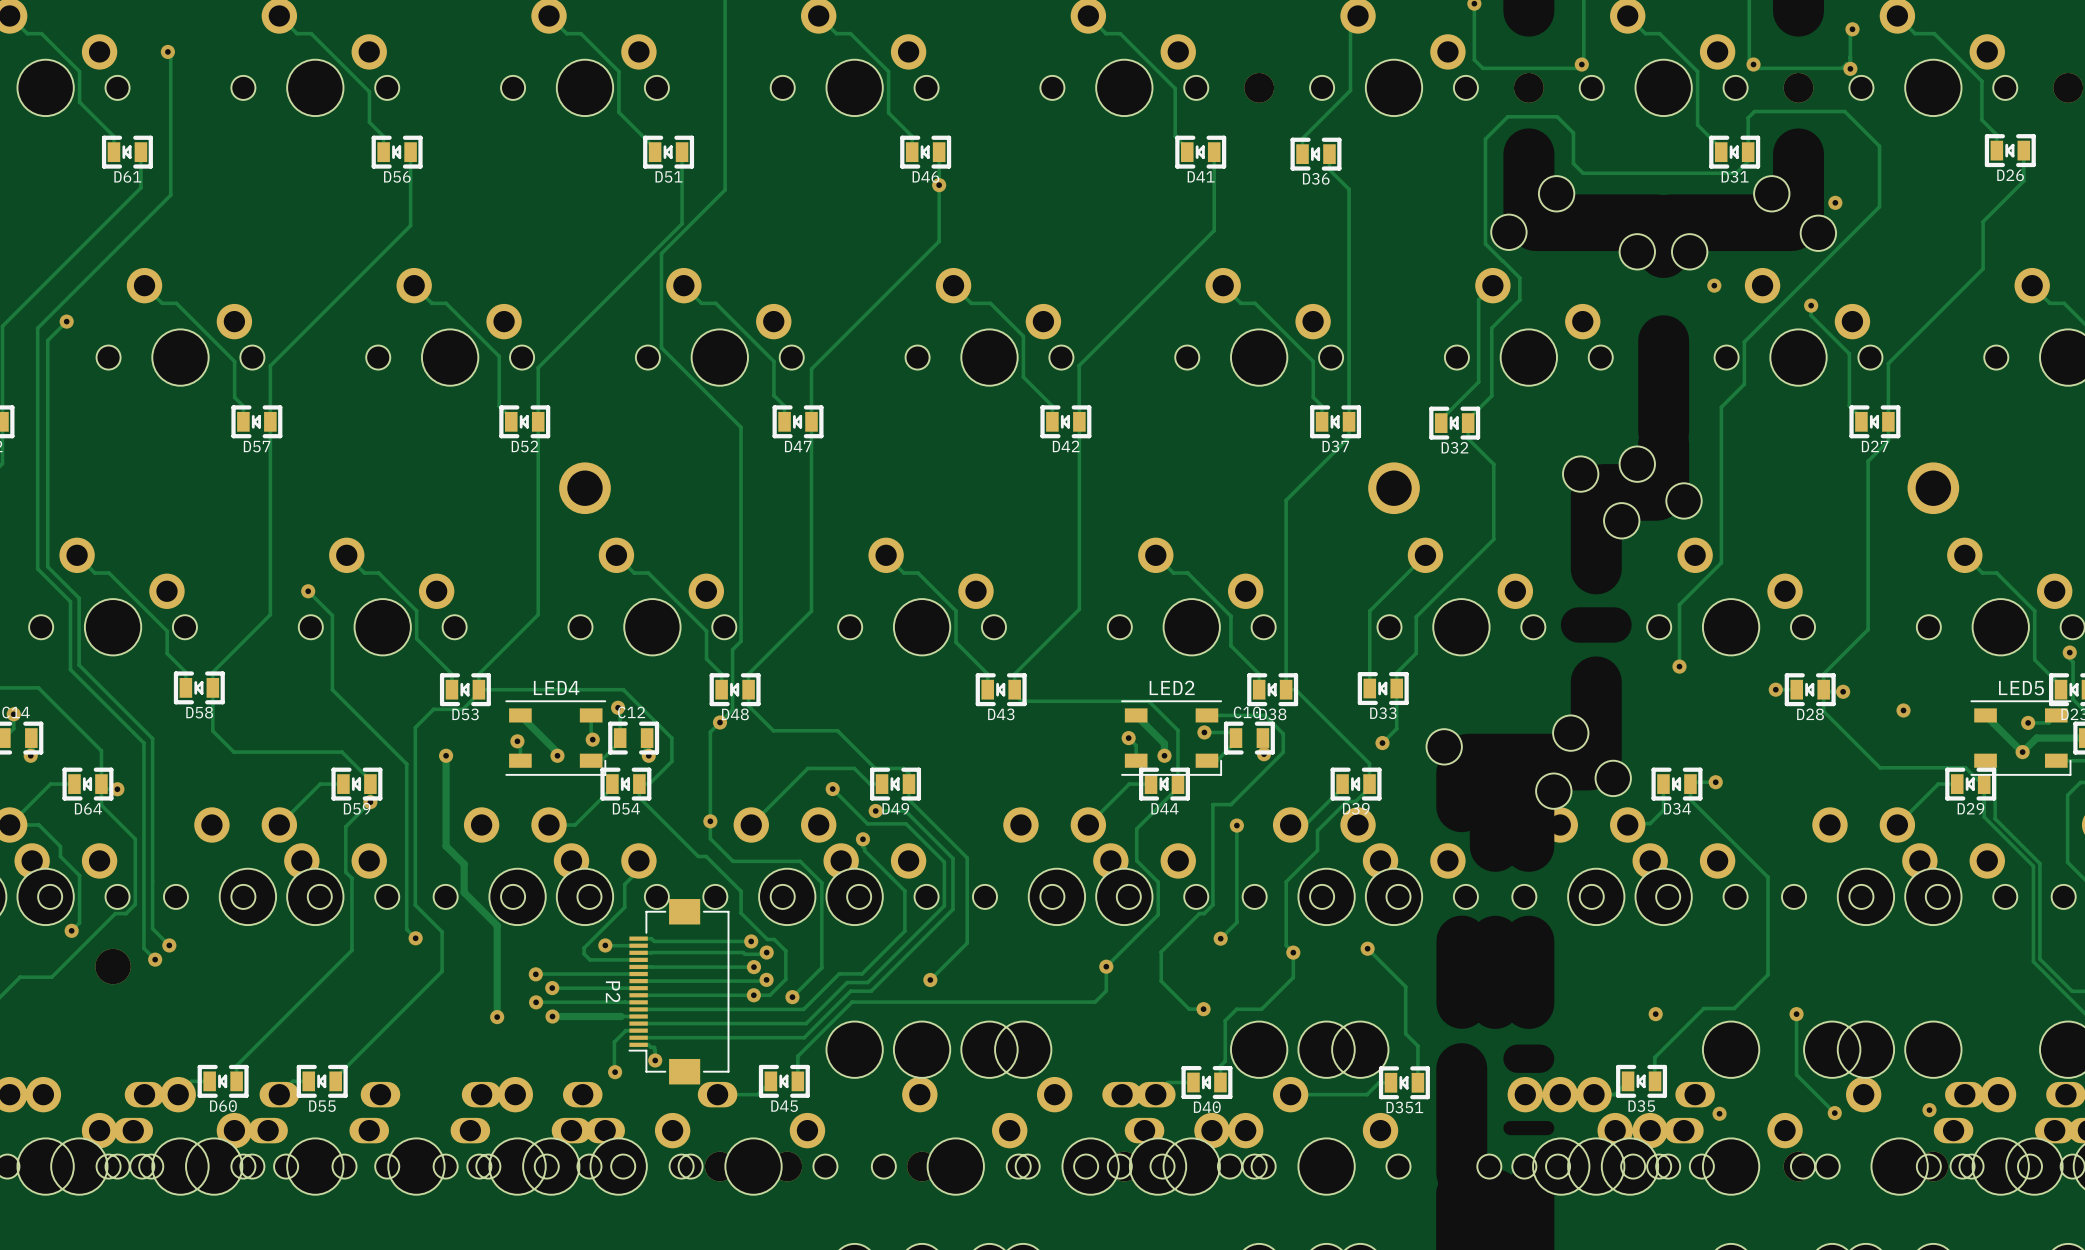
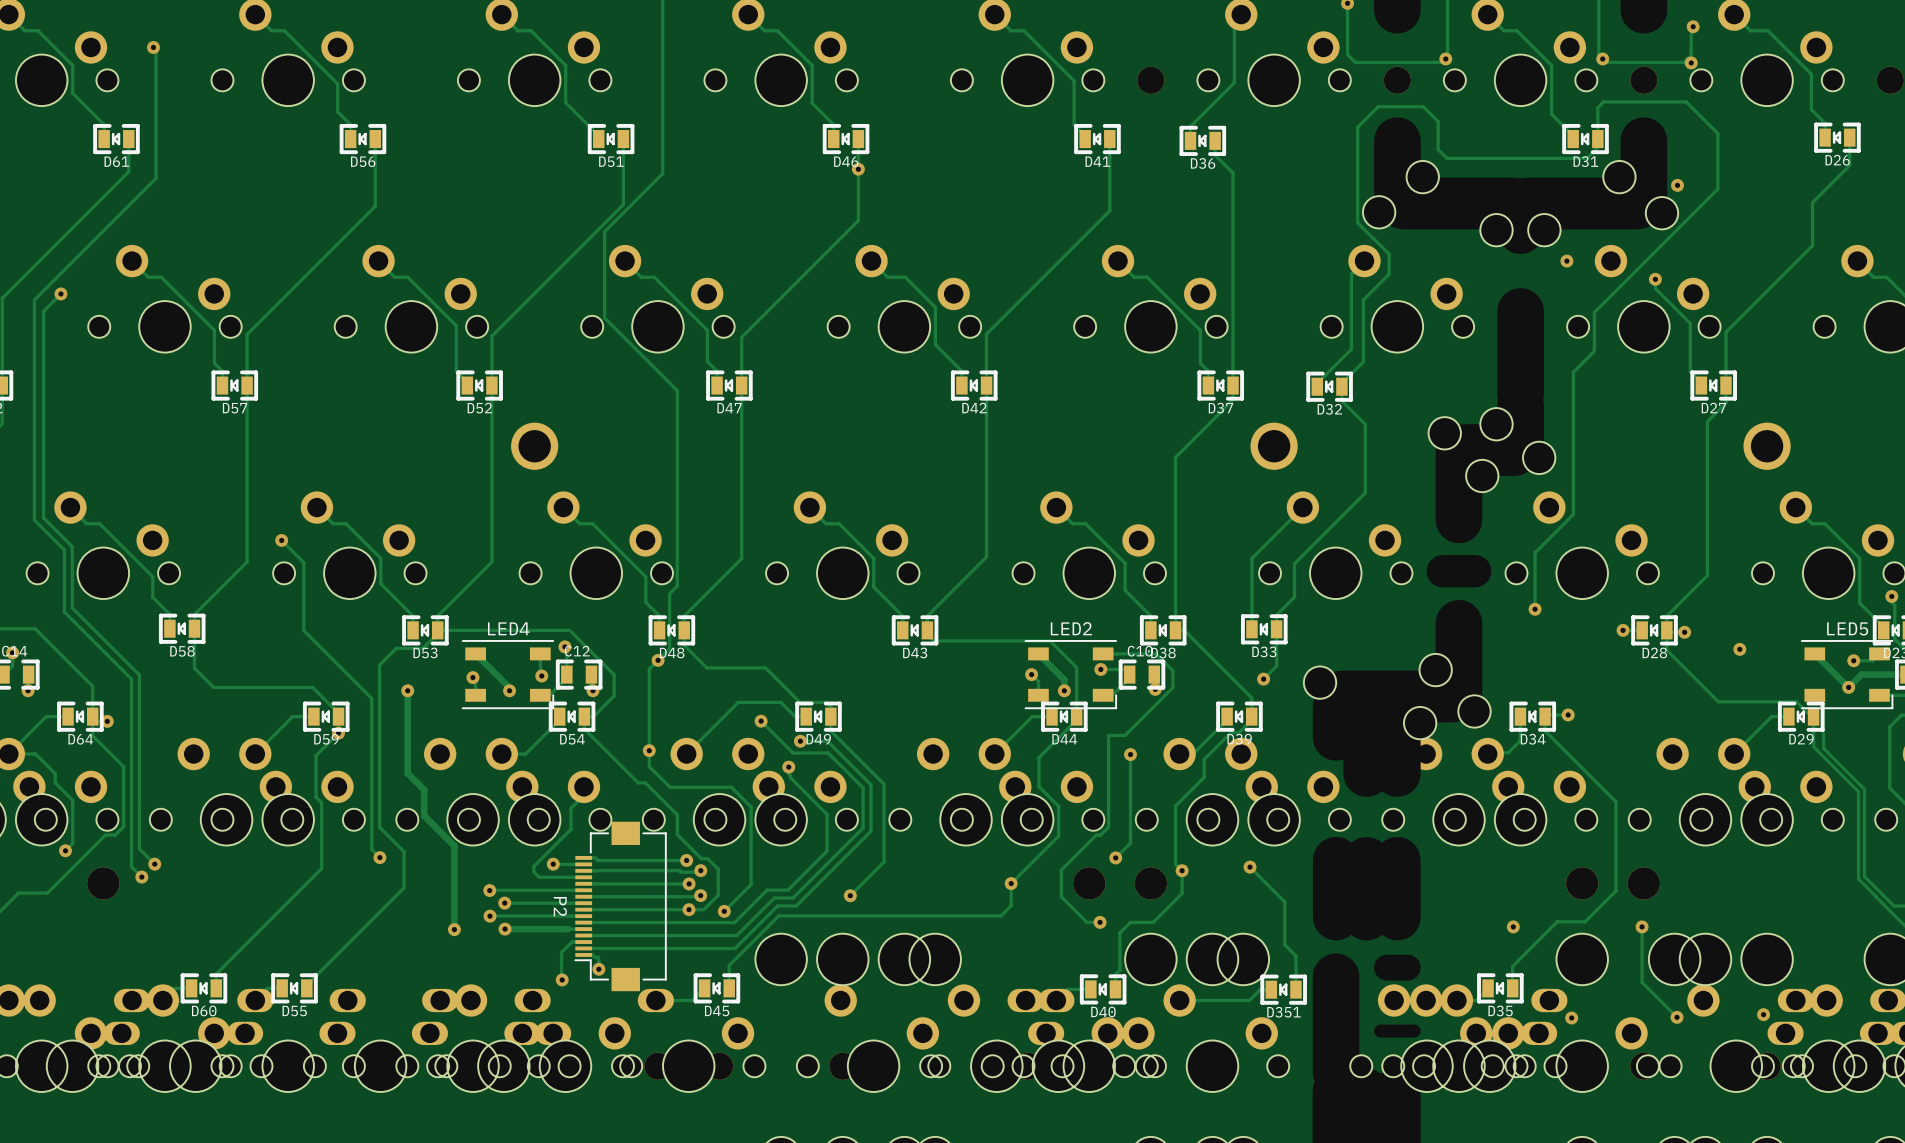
part: none -> (1089, 883)
part: none -> (1150, 883)
part: none -> (1582, 883)
part: none -> (1643, 883)

